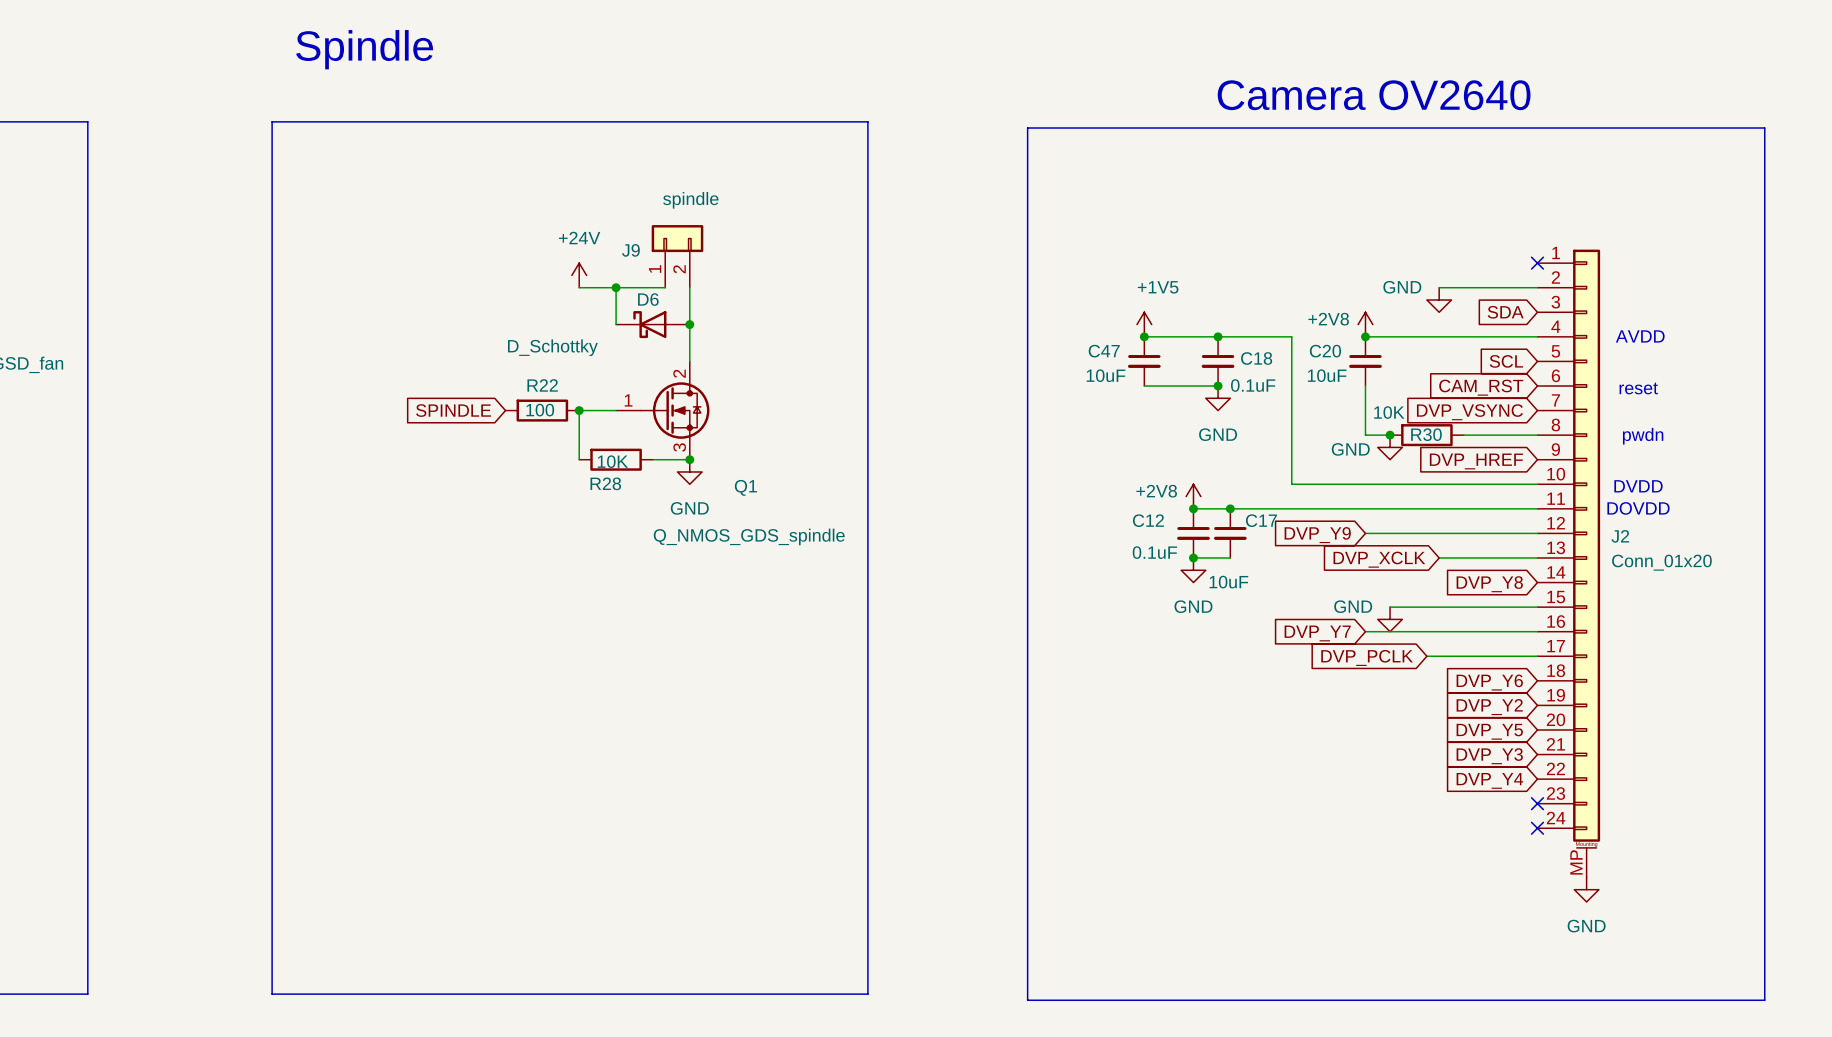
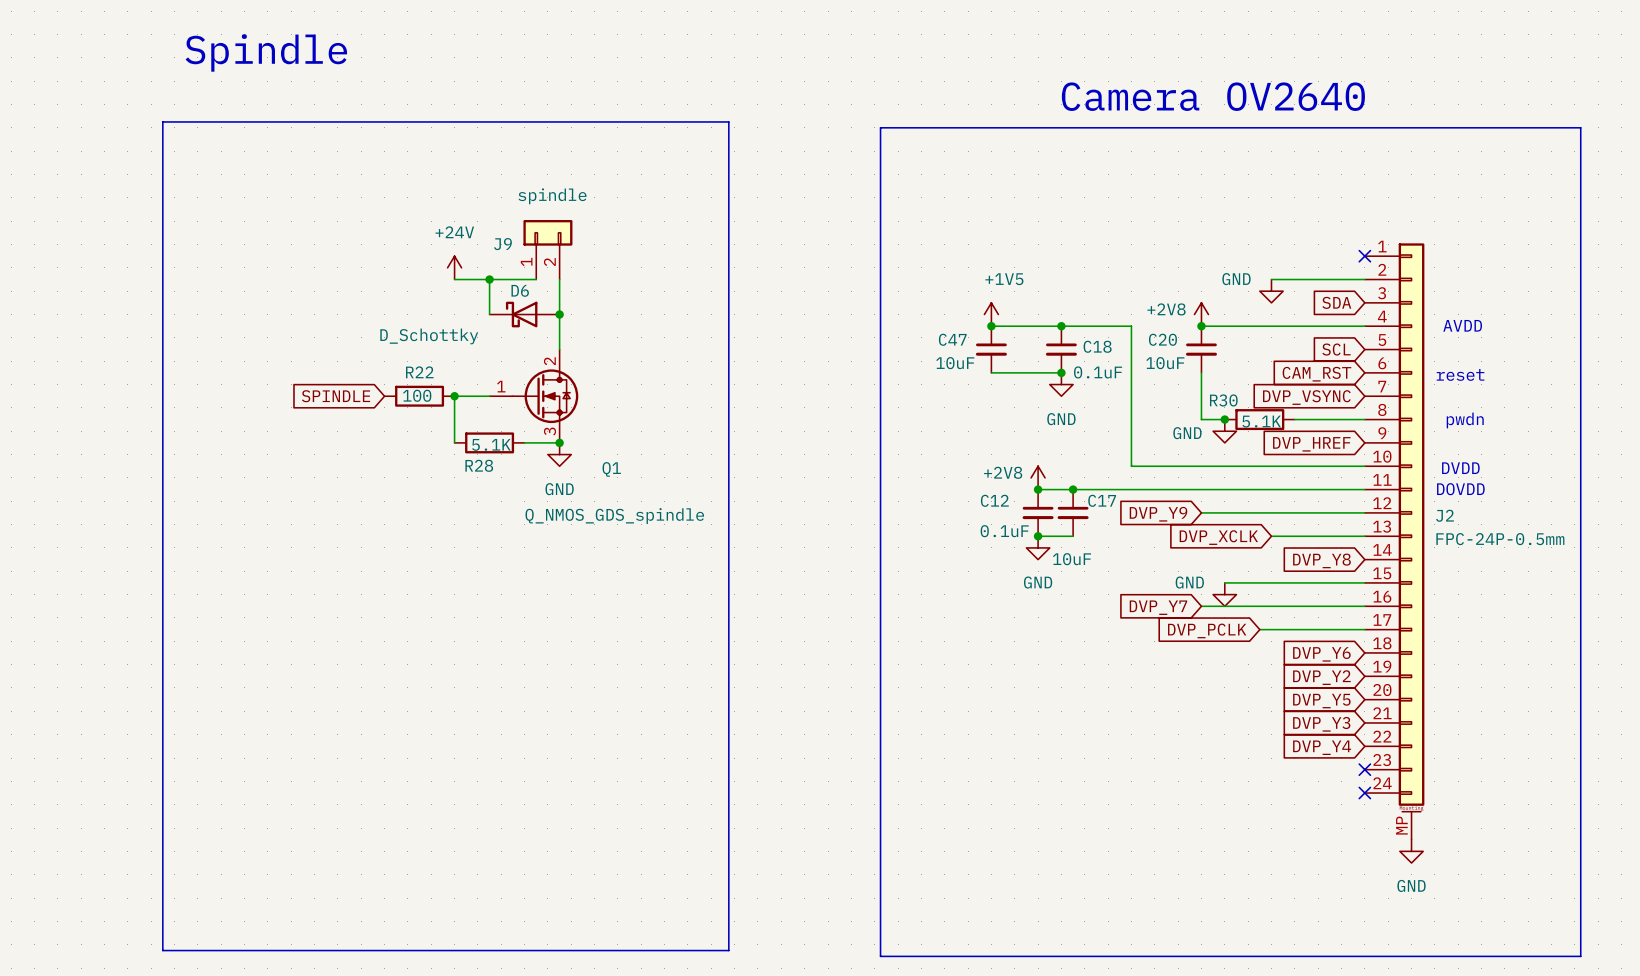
R30 value: 10K (1389, 412) -> 5.1K (1261, 421)
R30 name position: R30 (1426, 434) -> R30 (1223, 400)
R28 value: 10K (612, 461) -> 5.1K (491, 444)
J2 value: Conn_01x20 (1661, 562) -> FPC-24P-0.5mm (1500, 539)

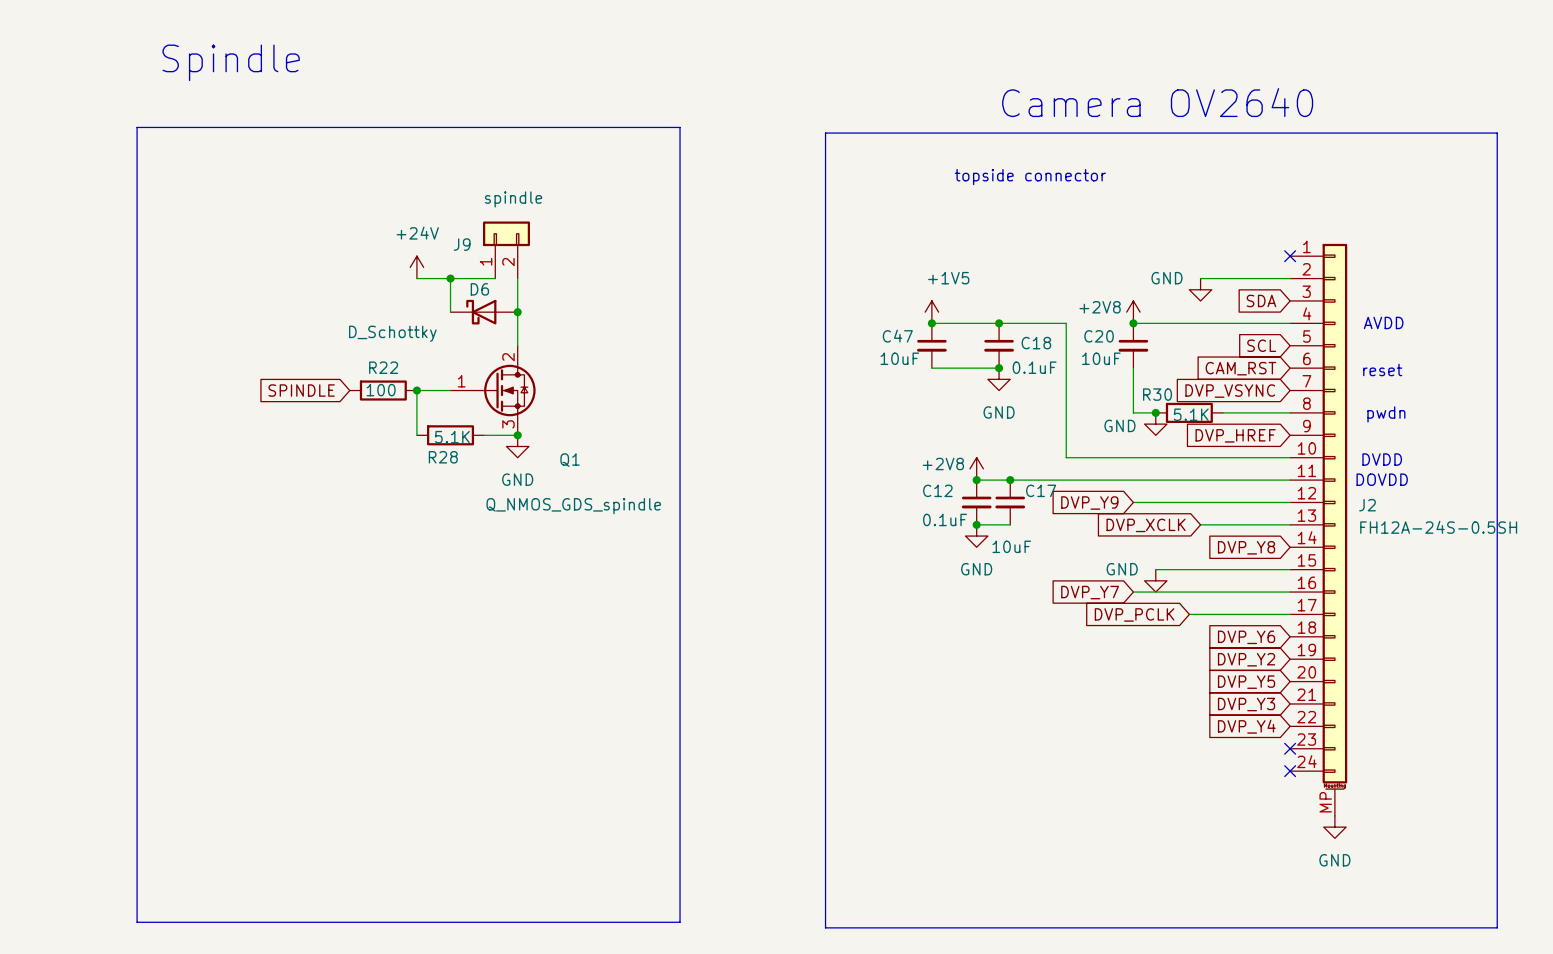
text: none -> topside connector (1030, 177)
J2 value: FPC-24P-0.5mm (1500, 539) -> FH12A-24S-0.5SH (1438, 527)

